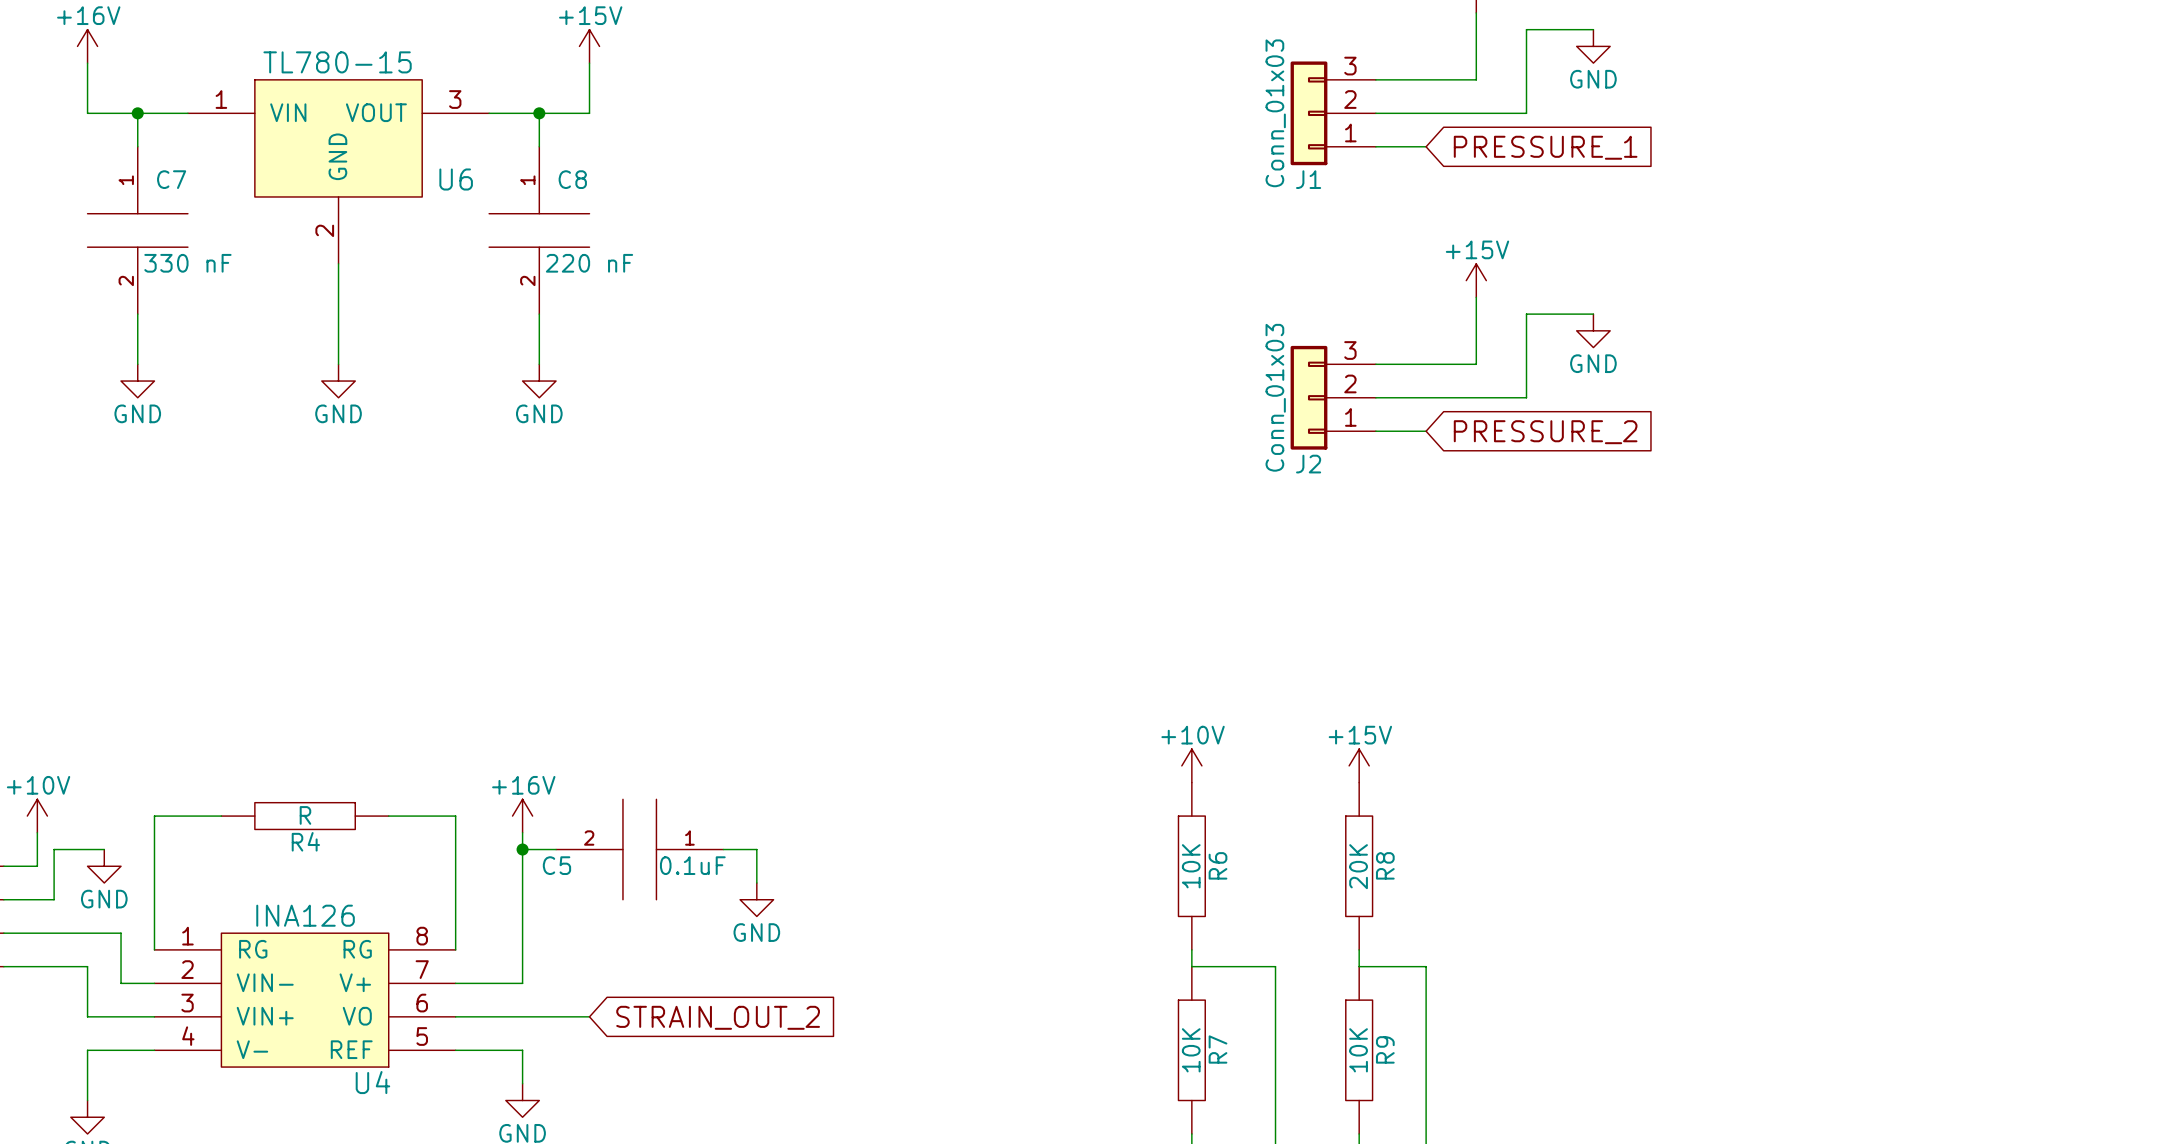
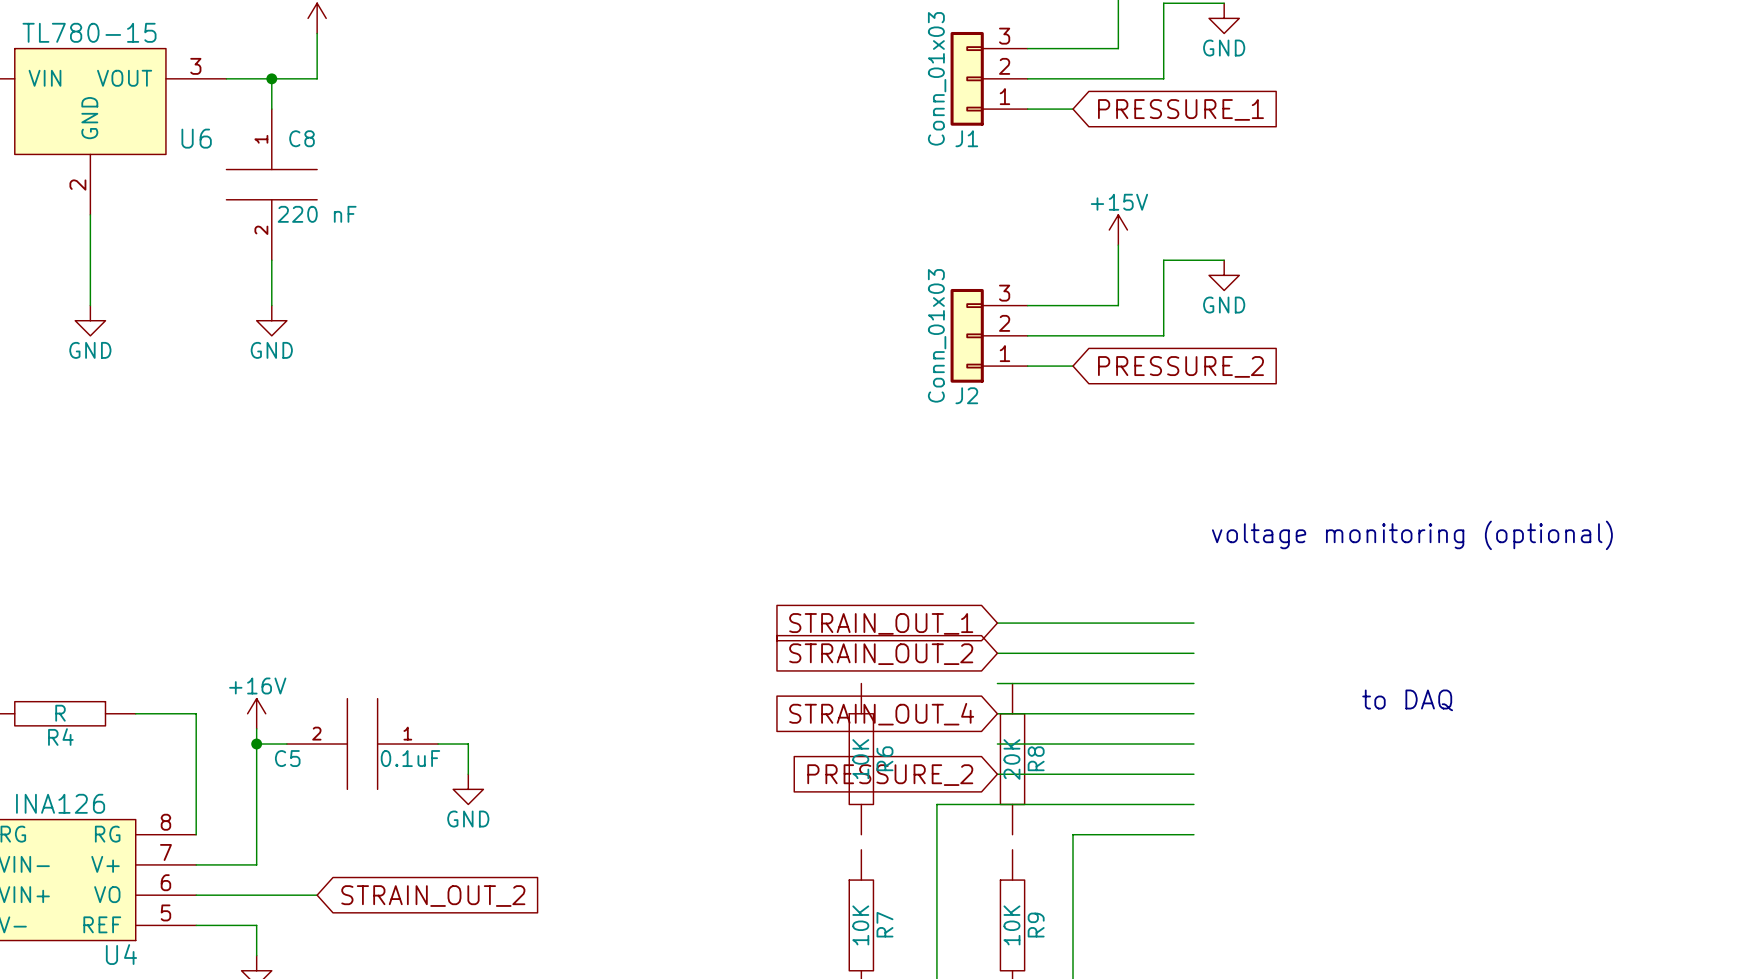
text: none -> voltage monitoring (optional) (1412, 535)
wire: none -> (997, 623) (1193, 623)
global label: none -> STRAIN_OUT_1 (881, 623)
wire: none -> (997, 653) (1193, 653)
global label: none -> STRAIN_OUT_2 (881, 654)
power symbol: +10V (1191, 765) -> none
power symbol: +15V (1359, 765) -> none
wire: none -> (997, 683) (1193, 683)
text: none -> to DAQ (1407, 700)
global label: none -> STRAIN_OUT_4 (881, 714)
wire: none -> (997, 713) (1193, 713)
wire: none -> (997, 744) (1193, 744)
wire: none -> (997, 774) (1193, 774)
global label: none -> PRESSURE_2 (890, 775)
wire: (1191, 949) (1191, 966) (1275, 966) -> (1193, 804) (936, 804) (936, 849)
wire: (1359, 949) (1359, 966) (1426, 966) -> (1193, 834) (1073, 834) (1073, 849)

